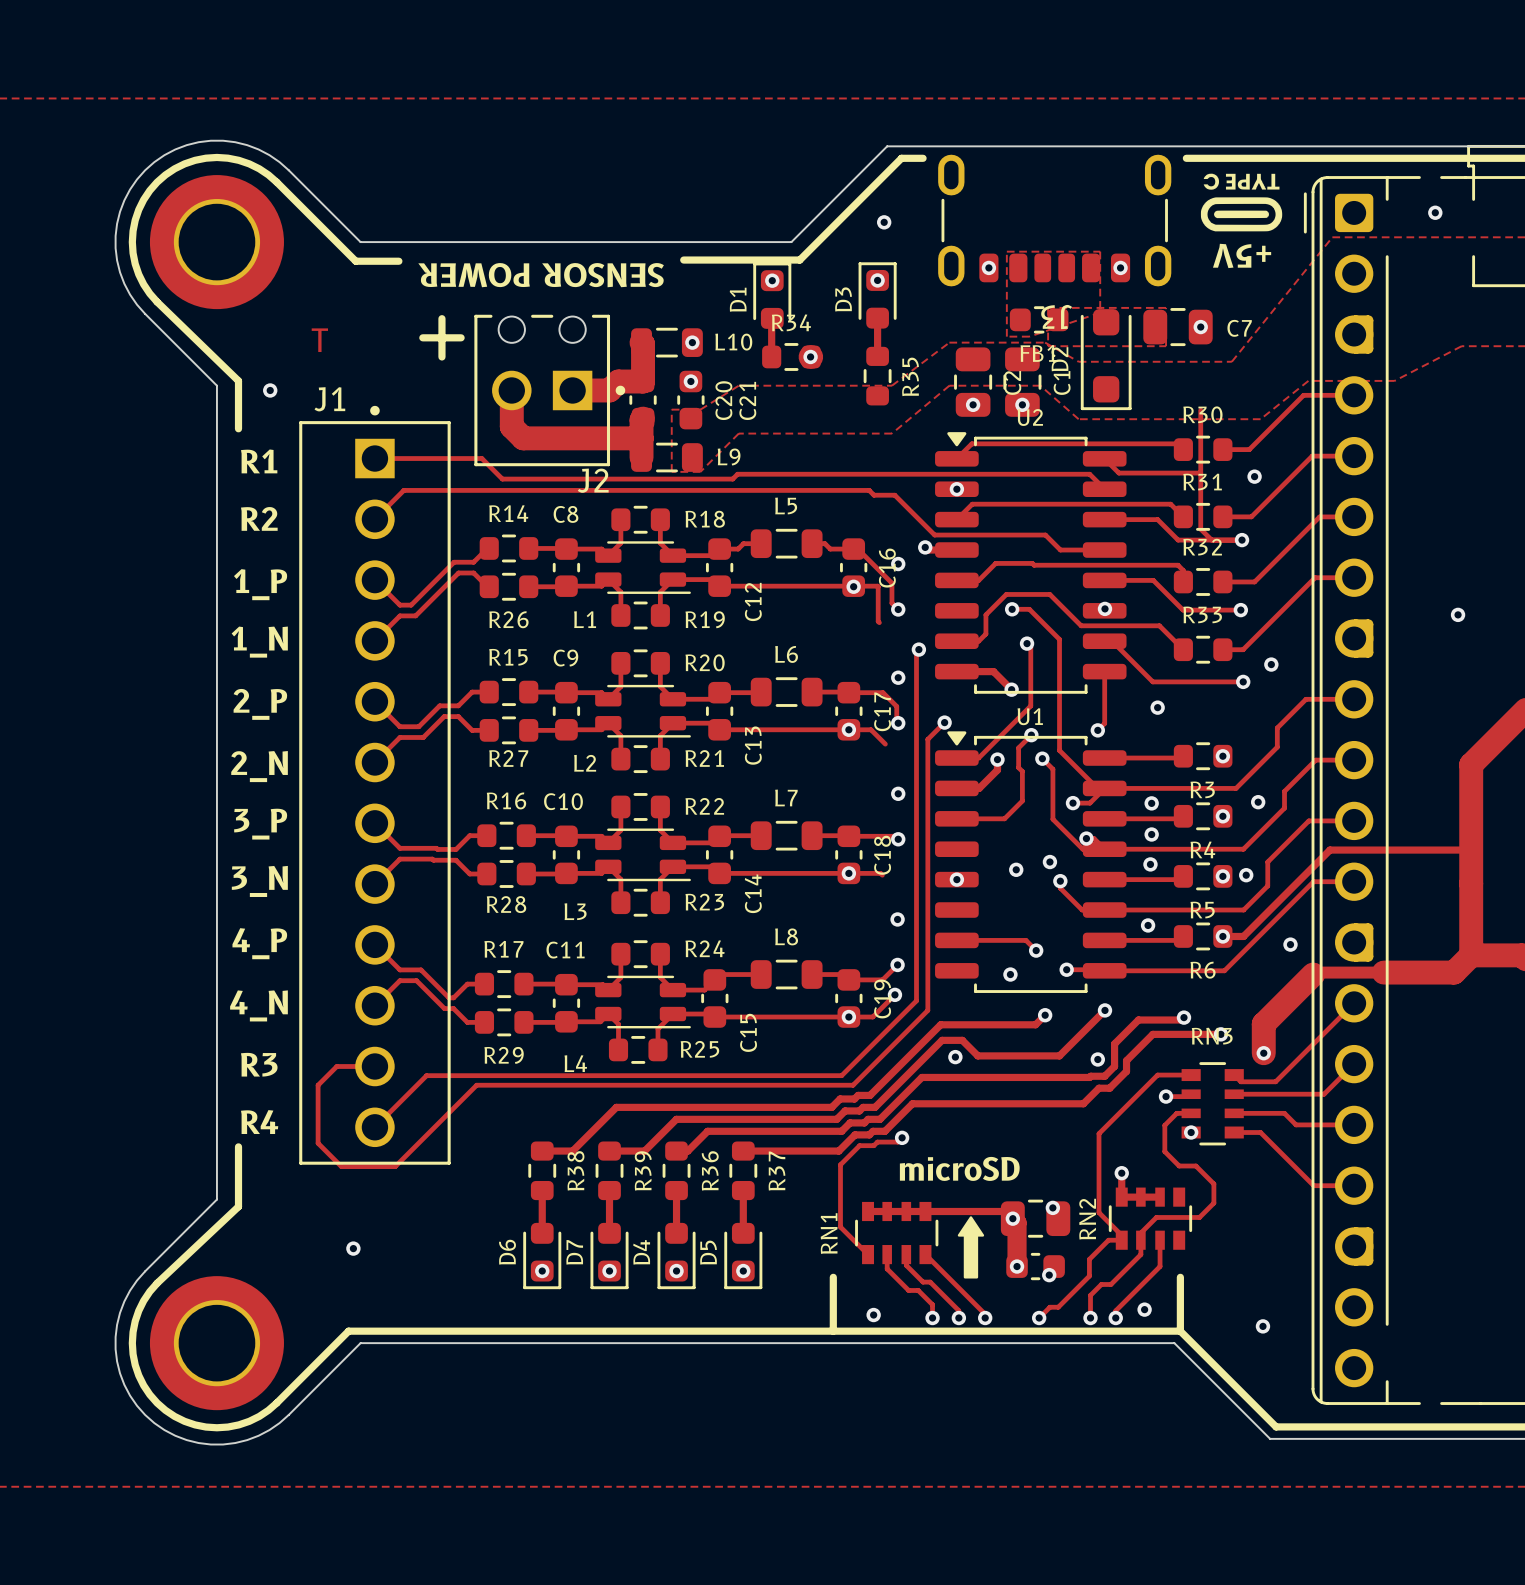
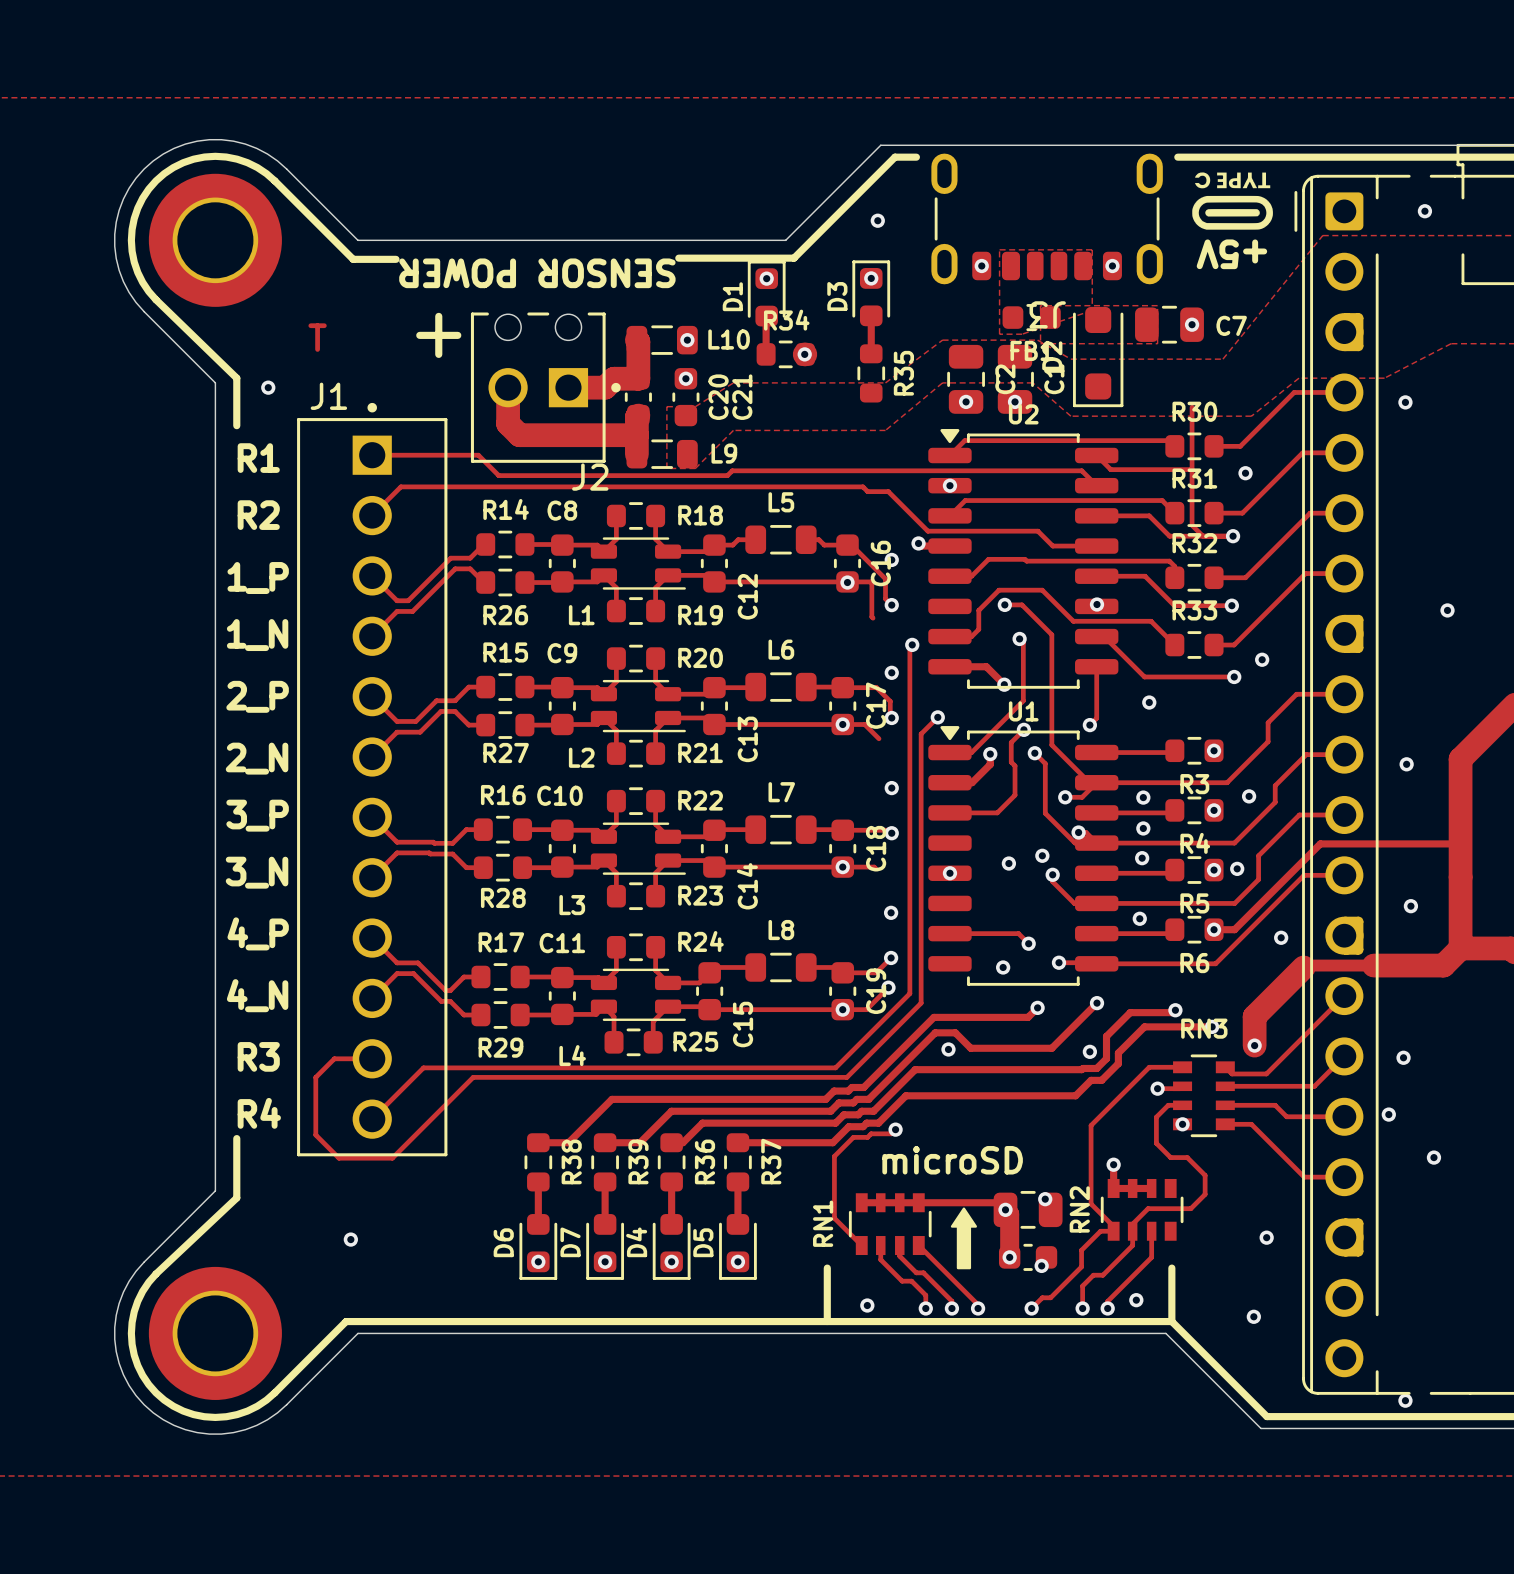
via: none -> (1405, 402)
via: none -> (1406, 764)
via: none -> (1410, 906)
via: none -> (1403, 1057)
via: none -> (1388, 1114)
via: none -> (1433, 1157)
via: none -> (1266, 1237)
via: none -> (1405, 1400)

